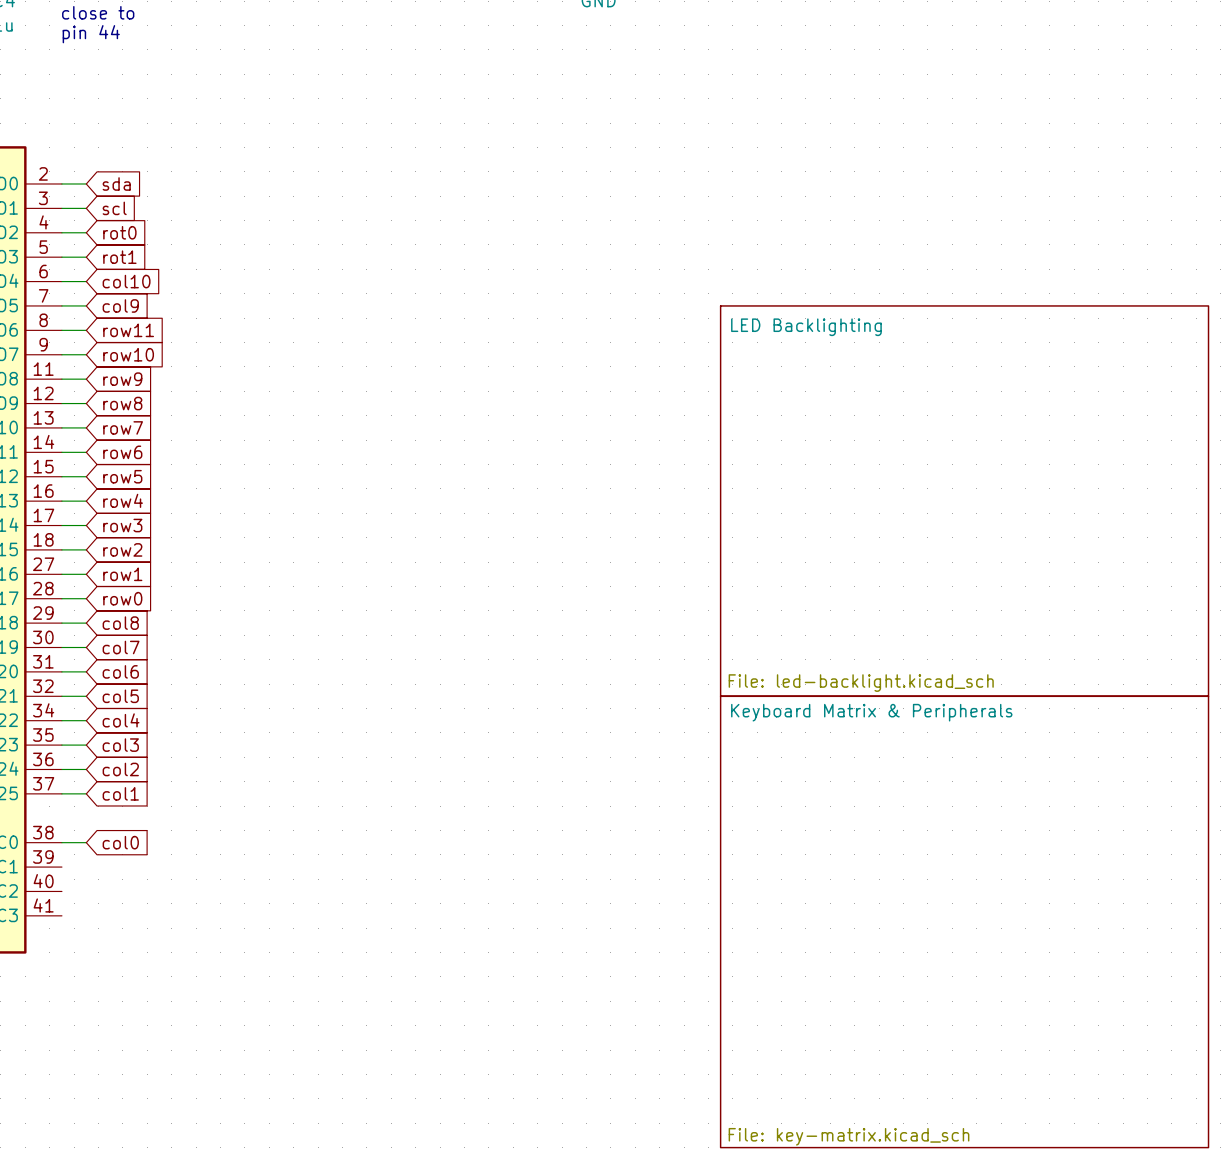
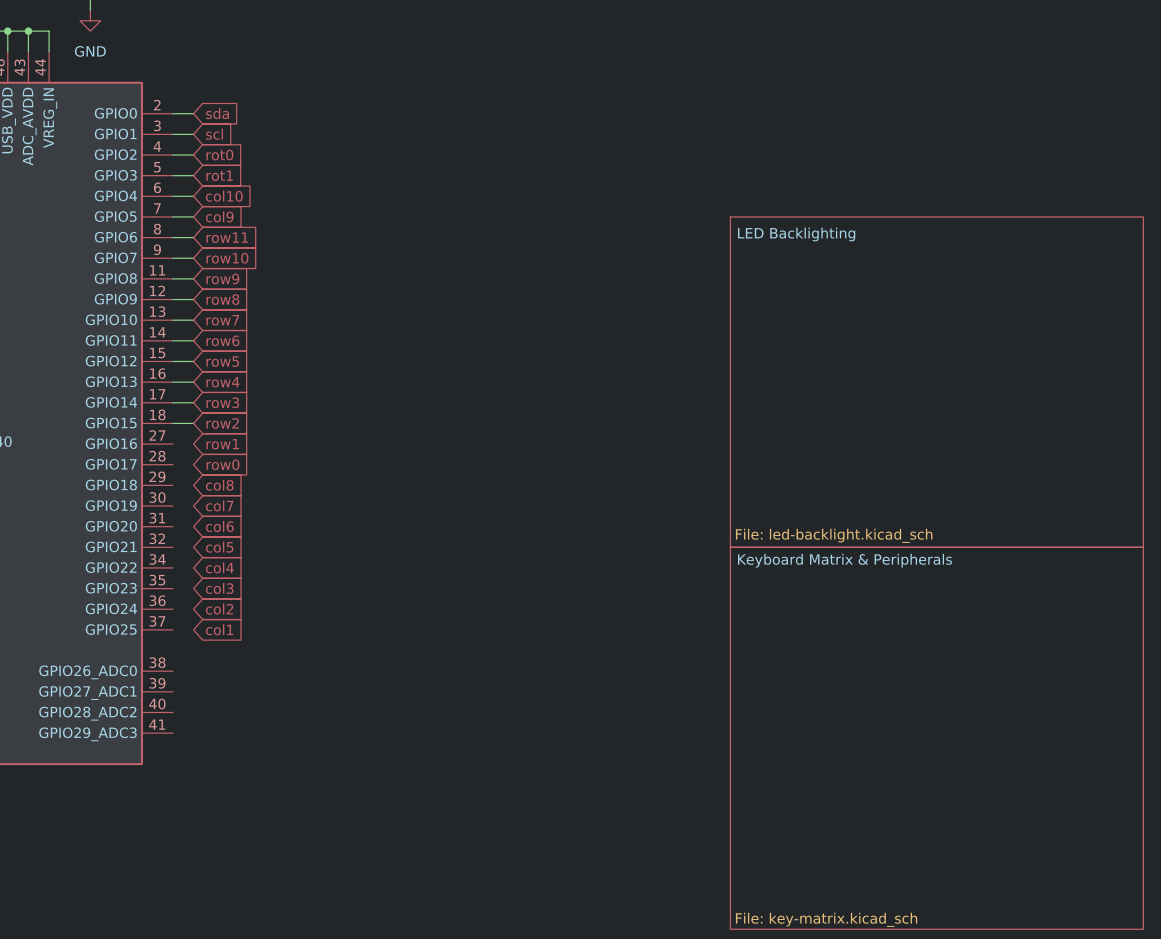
wire: (61, 574) (86, 574) -> none
wire: (61, 598) (86, 598) -> none
wire: (61, 623) (86, 623) -> none
wire: (61, 647) (86, 647) -> none
wire: (61, 671) (86, 671) -> none
wire: (61, 696) (86, 696) -> none
wire: (61, 720) (86, 720) -> none
wire: (61, 745) (86, 745) -> none
wire: (61, 769) (86, 769) -> none
wire: (61, 793) (86, 793) -> none
wire: (61, 842) (86, 842) -> none
global label: col0 (120, 842) -> none

